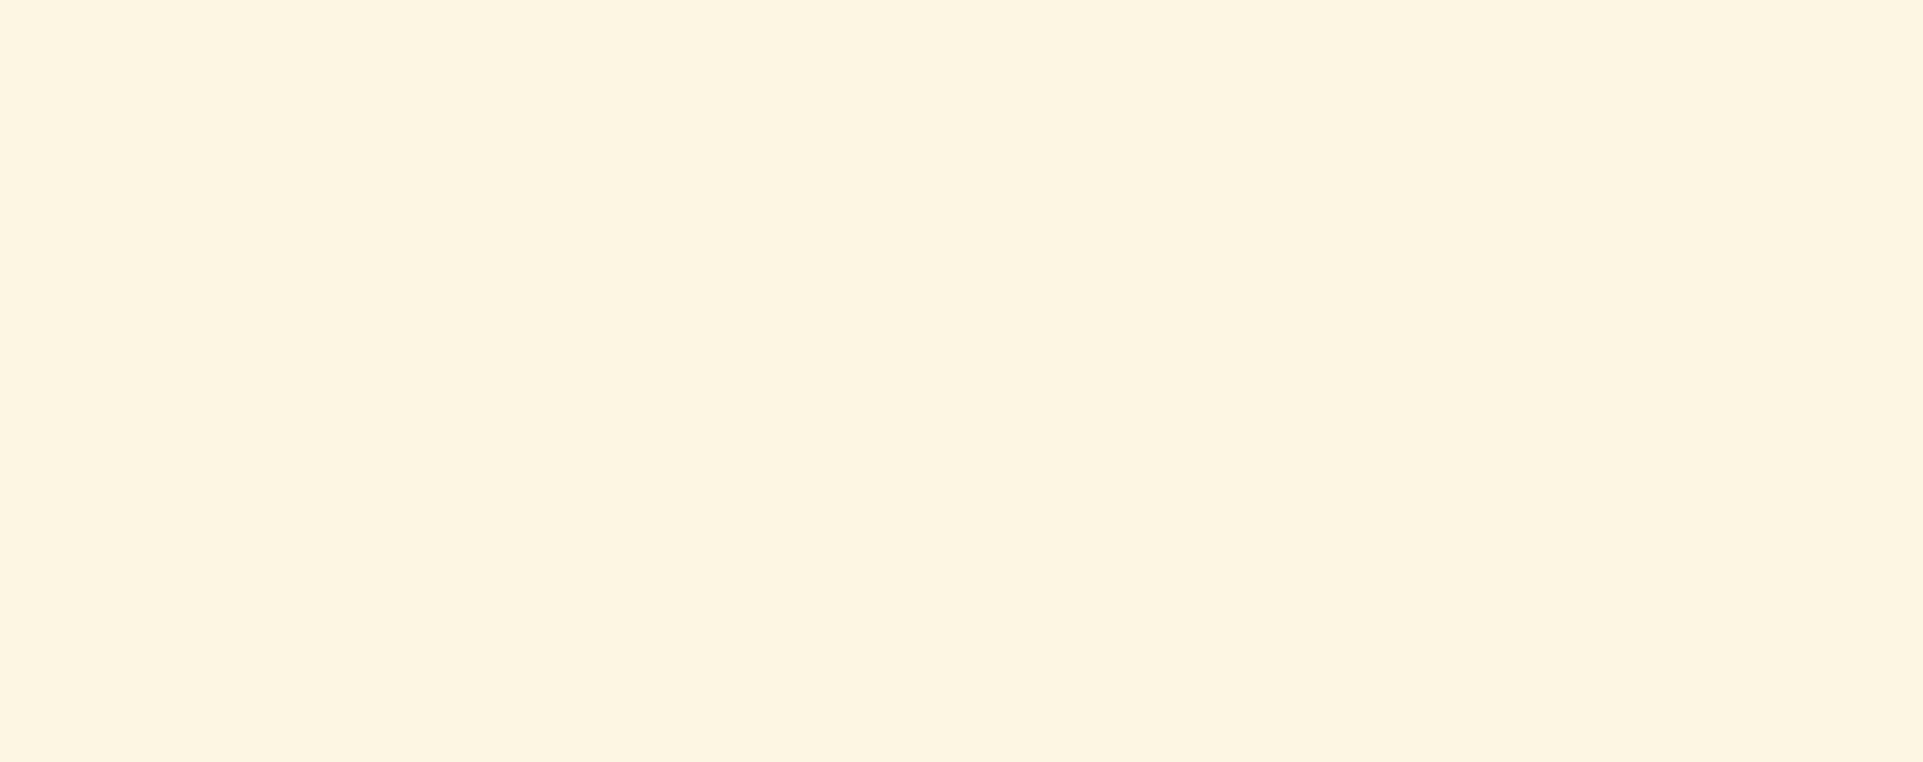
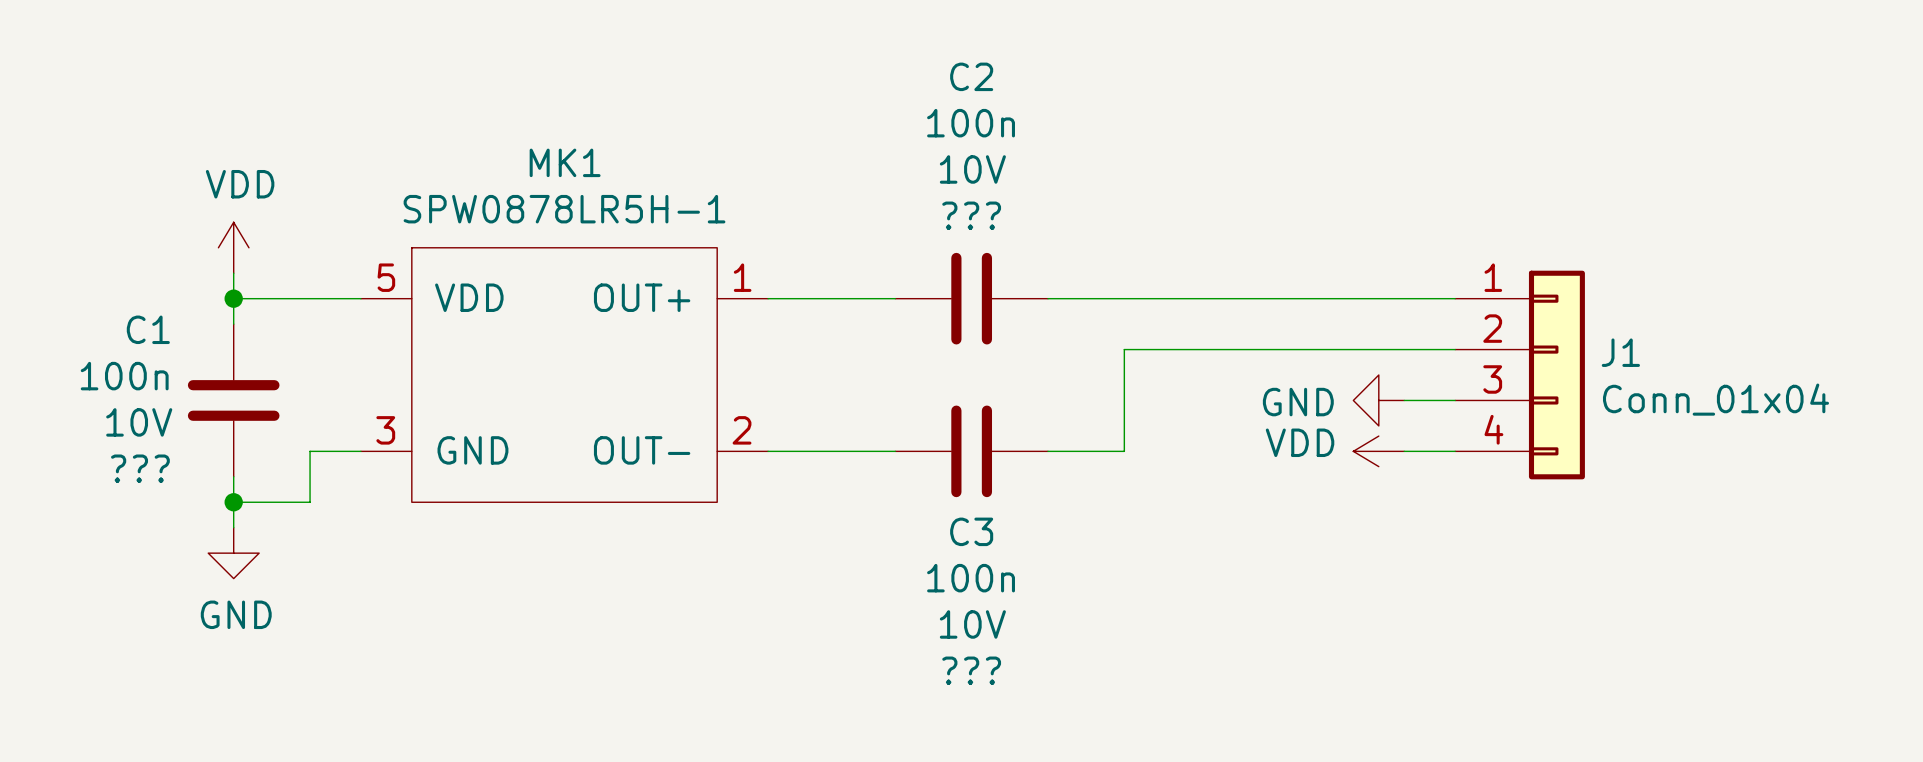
power symbol: none -> VDD (233, 247)
wire: none -> (233, 273) (233, 324)
wire: none -> (233, 298) (360, 298)
junction: none -> (233, 298)
wire: none -> (768, 298) (895, 298)
C2: none -> 100n (971, 298)
wire: none -> (1047, 298) (1455, 298)
wire: none -> (1455, 349) (1124, 349) (1124, 451) (1047, 451)
MK1: none -> SPW0878LR5H-1 (564, 375)
J1: none -> Conn_01x04 (1520, 375)
C1: none -> 100n (233, 400)
power symbol: none -> GND (1378, 400)
wire: none -> (1404, 400) (1455, 400)
wire: none -> (360, 451) (310, 451) (310, 502) (233, 502)
wire: none -> (768, 451) (895, 451)
C3: none -> 100n (971, 451)
power symbol: none -> VDD (1378, 451)
wire: none -> (1404, 451) (1455, 451)
wire: none -> (233, 476) (233, 527)
junction: none -> (233, 502)
power symbol: none -> GND (233, 553)

